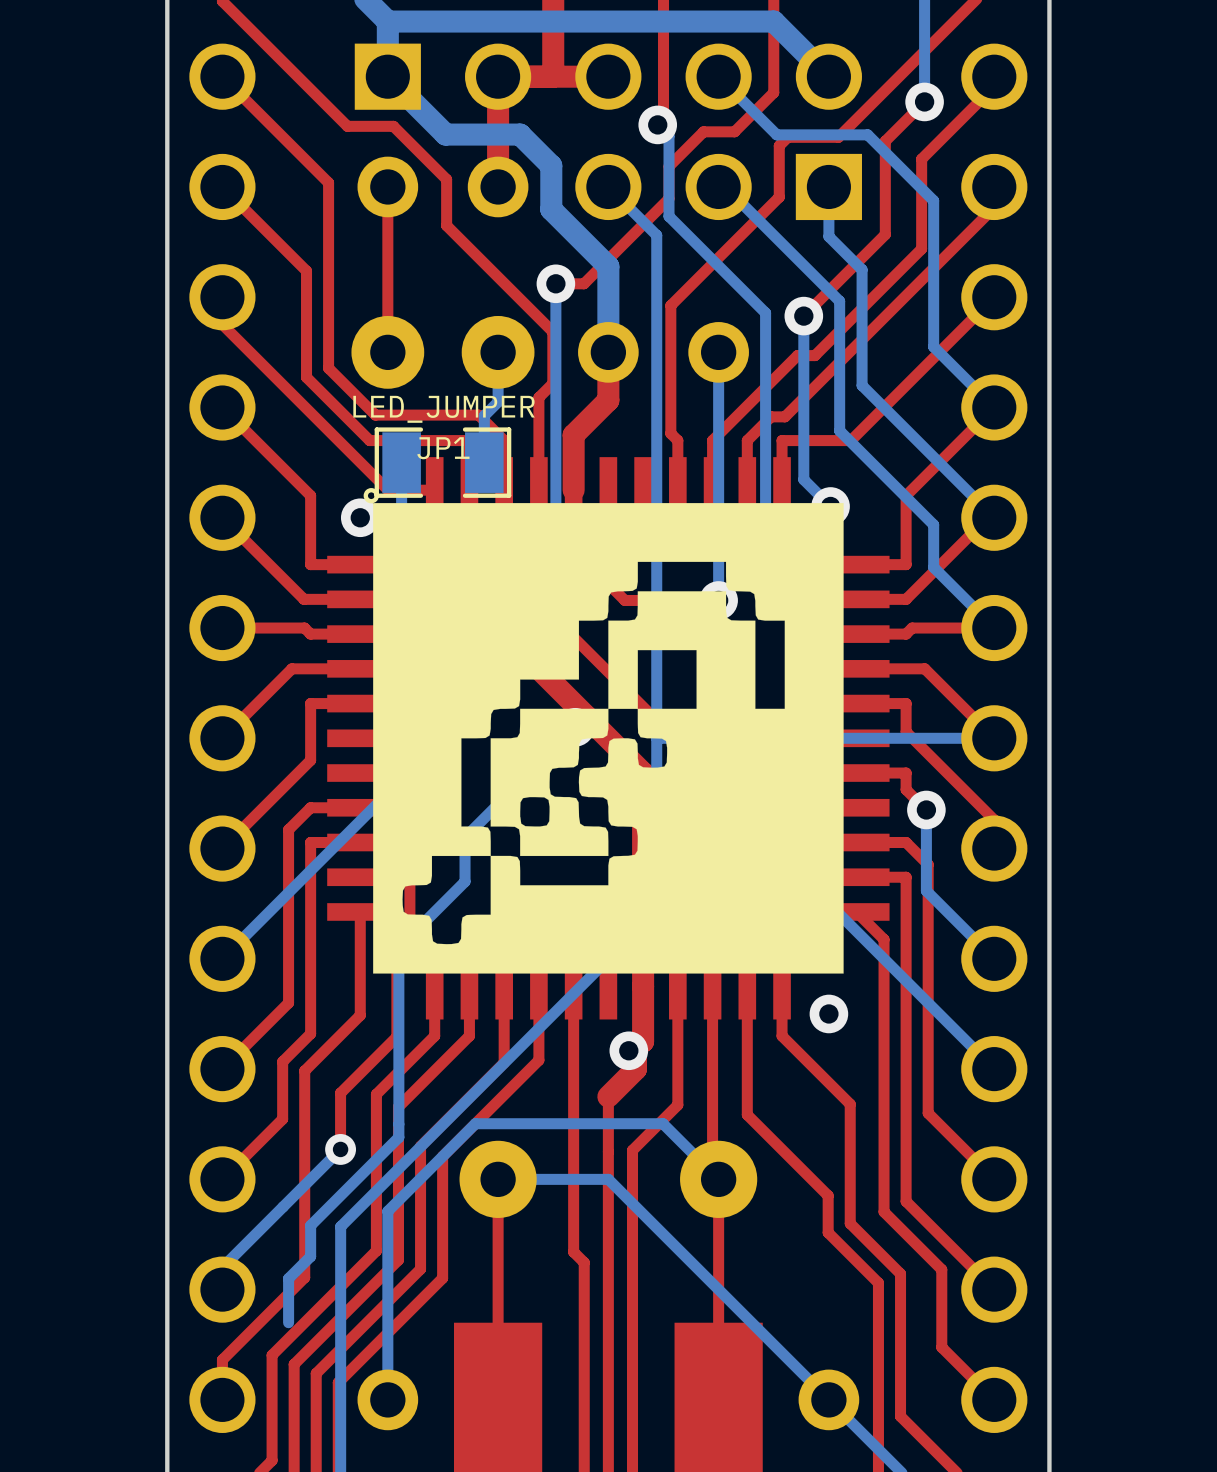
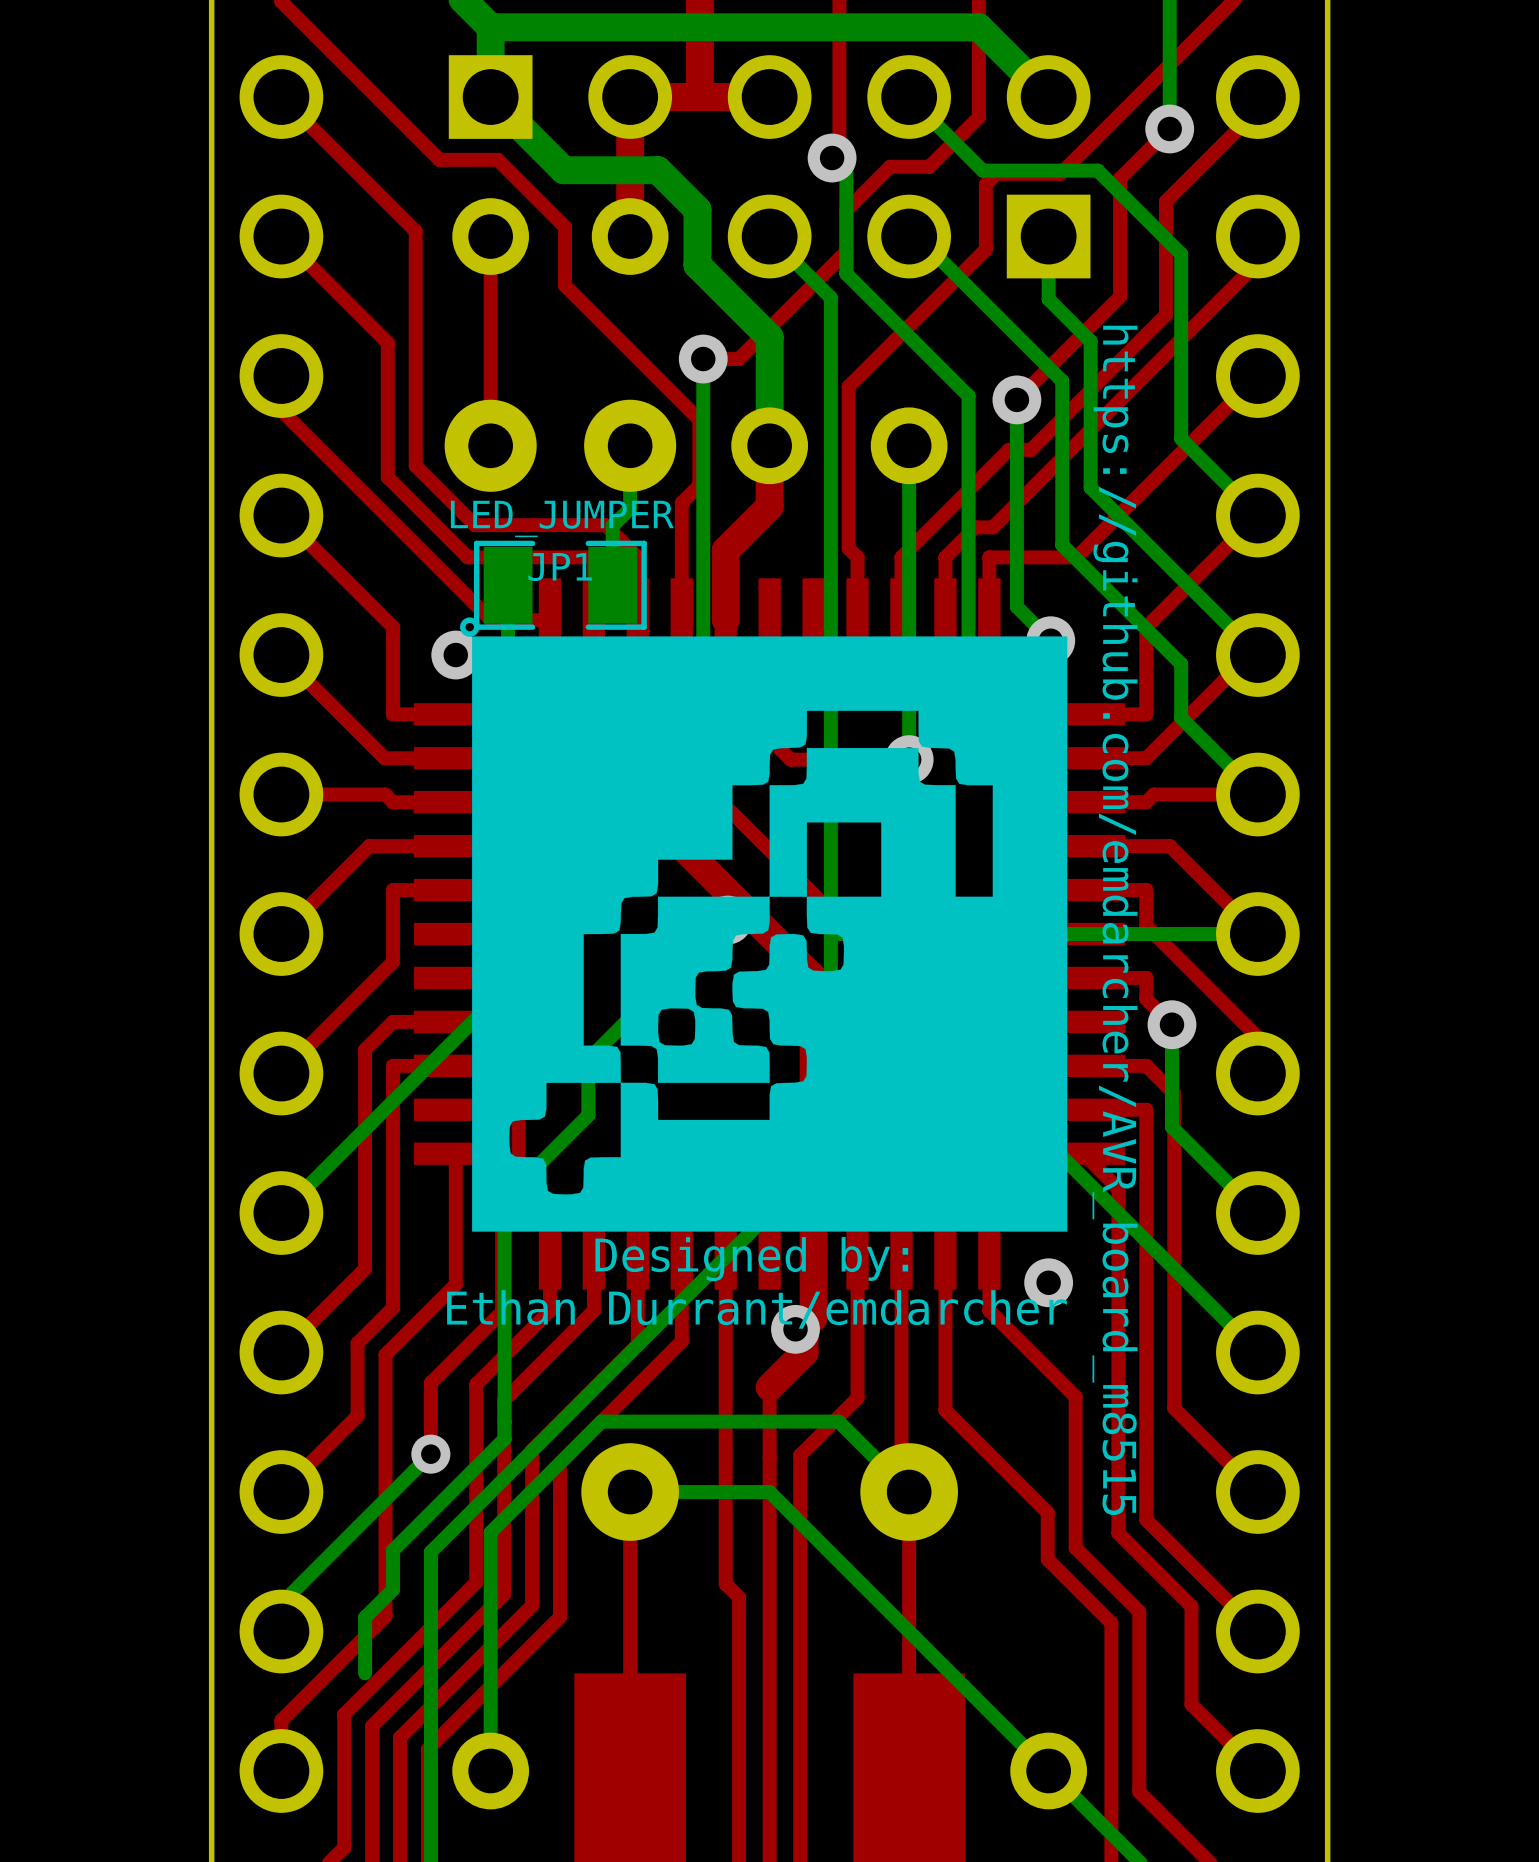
text: none -> https://github.com/emdarcher/AVR_board_m8515 (1114, 920)
text: none -> Designed by: (751, 1259)
text: none -> Ethan Durrant/emdarcher (757, 1309)

